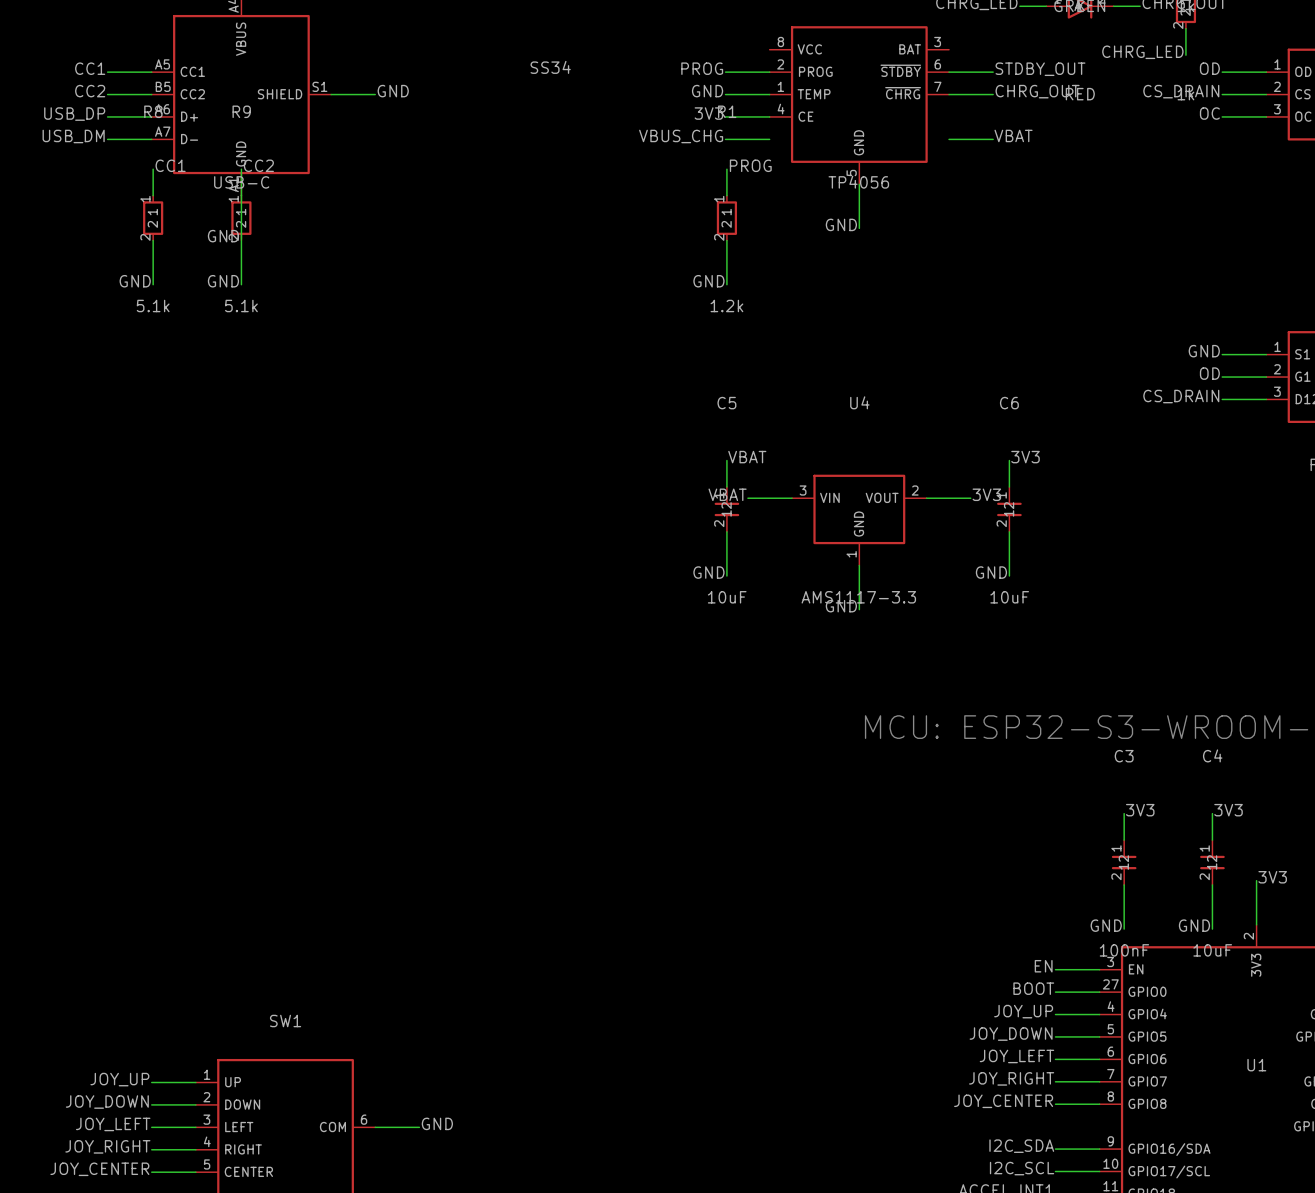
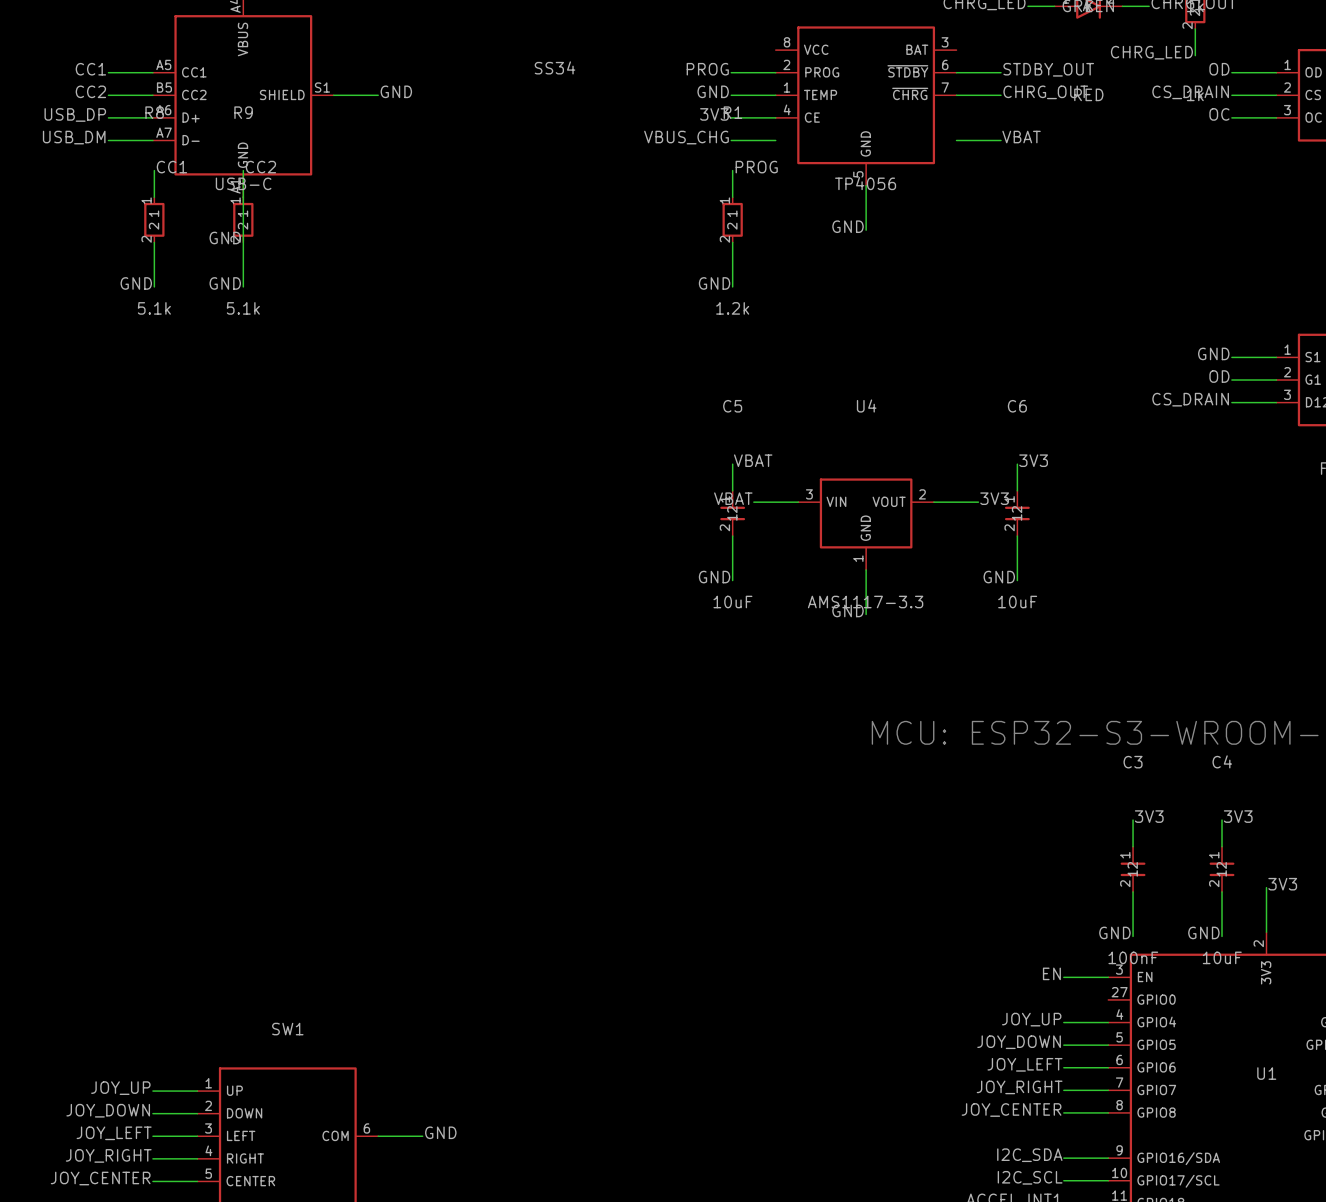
label: BOOT (1033, 988) -> none
wire: (1055, 992) (1099, 992) -> none

